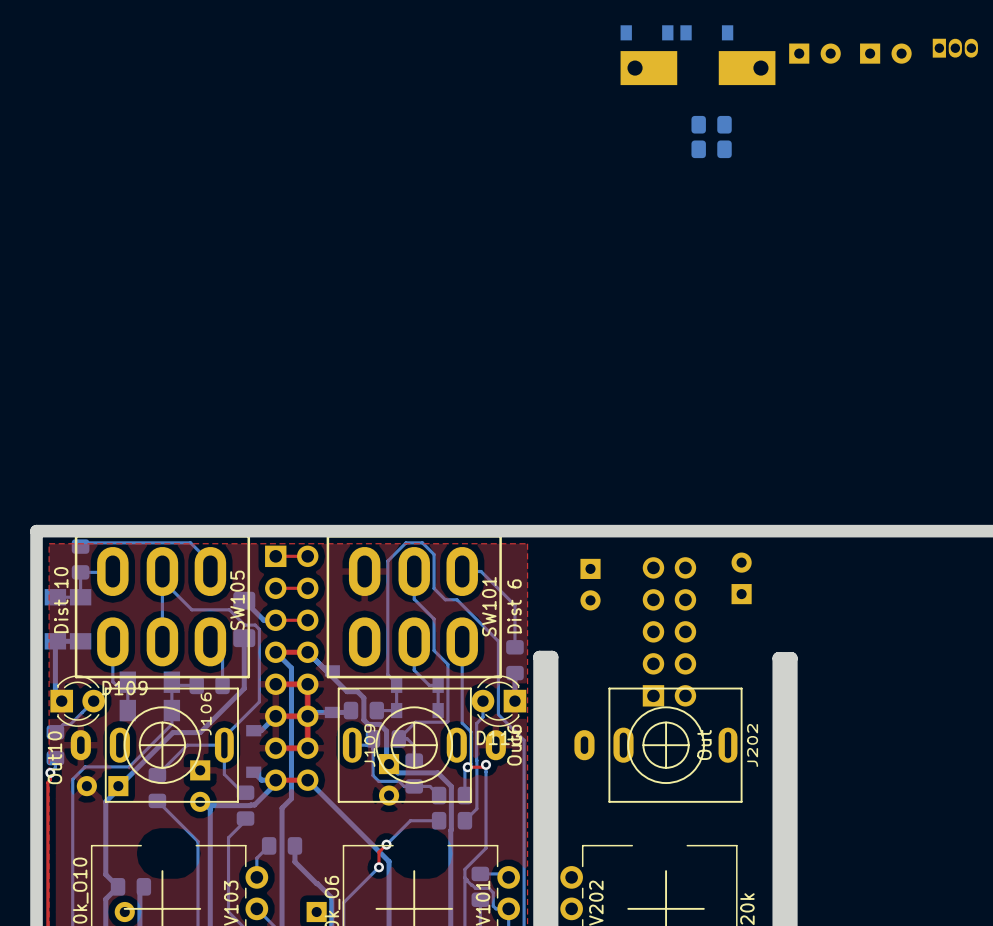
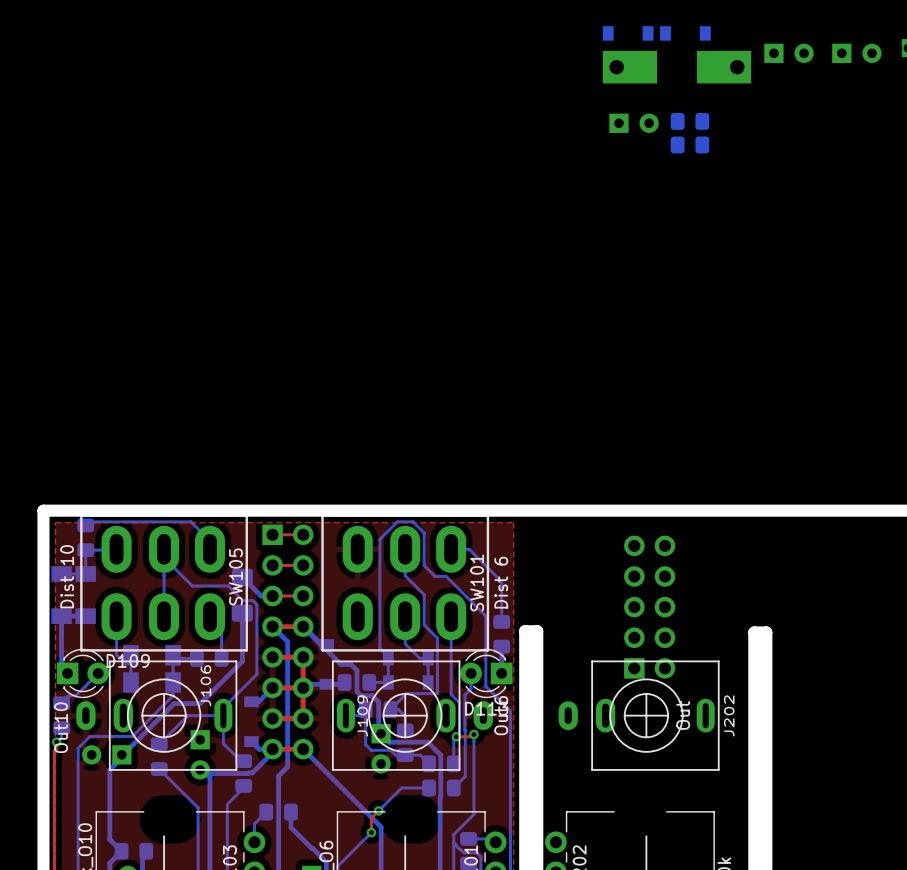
part: none -> (634, 123)
part: (741, 578) -> none
part: (590, 584) -> none

